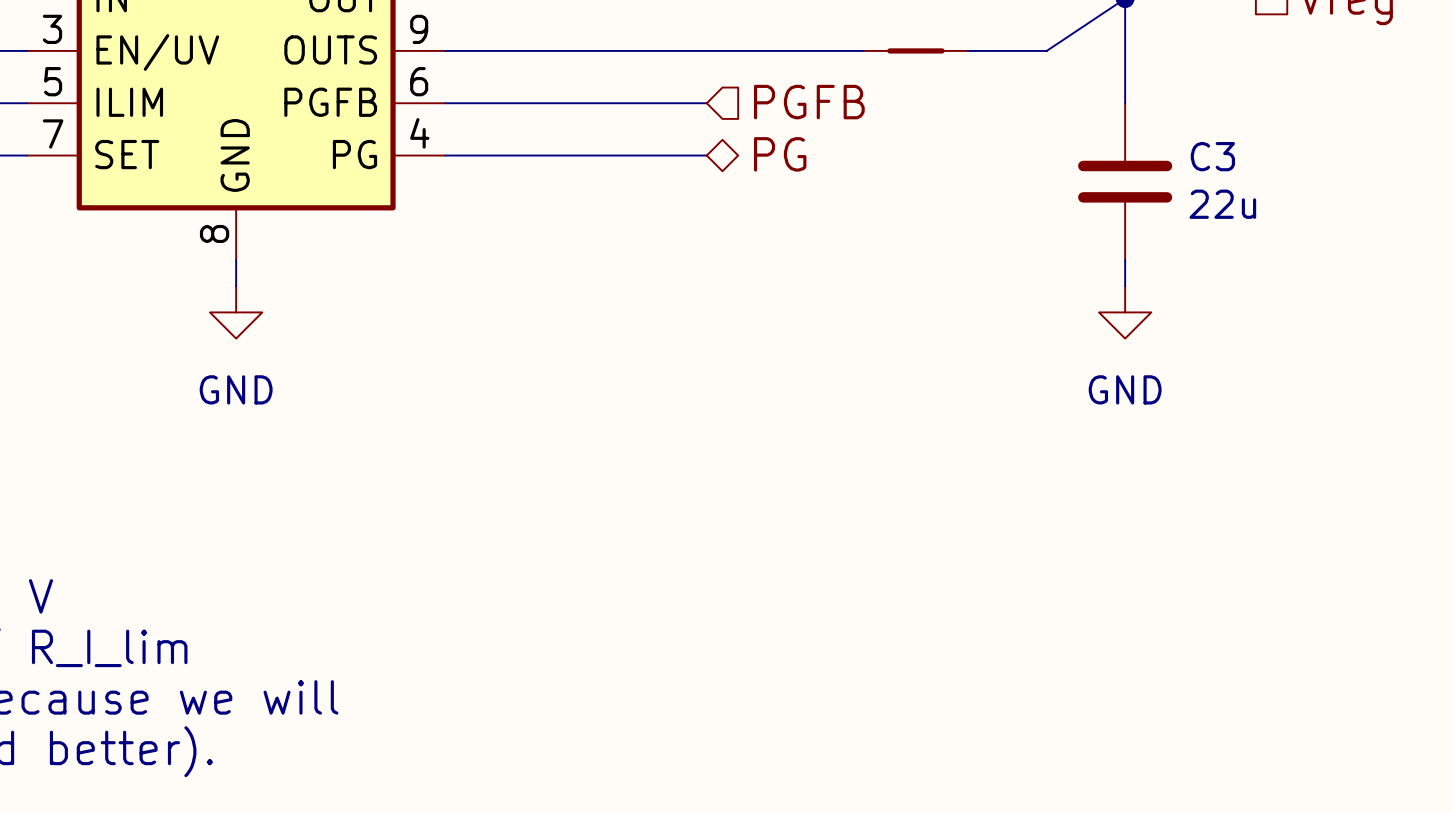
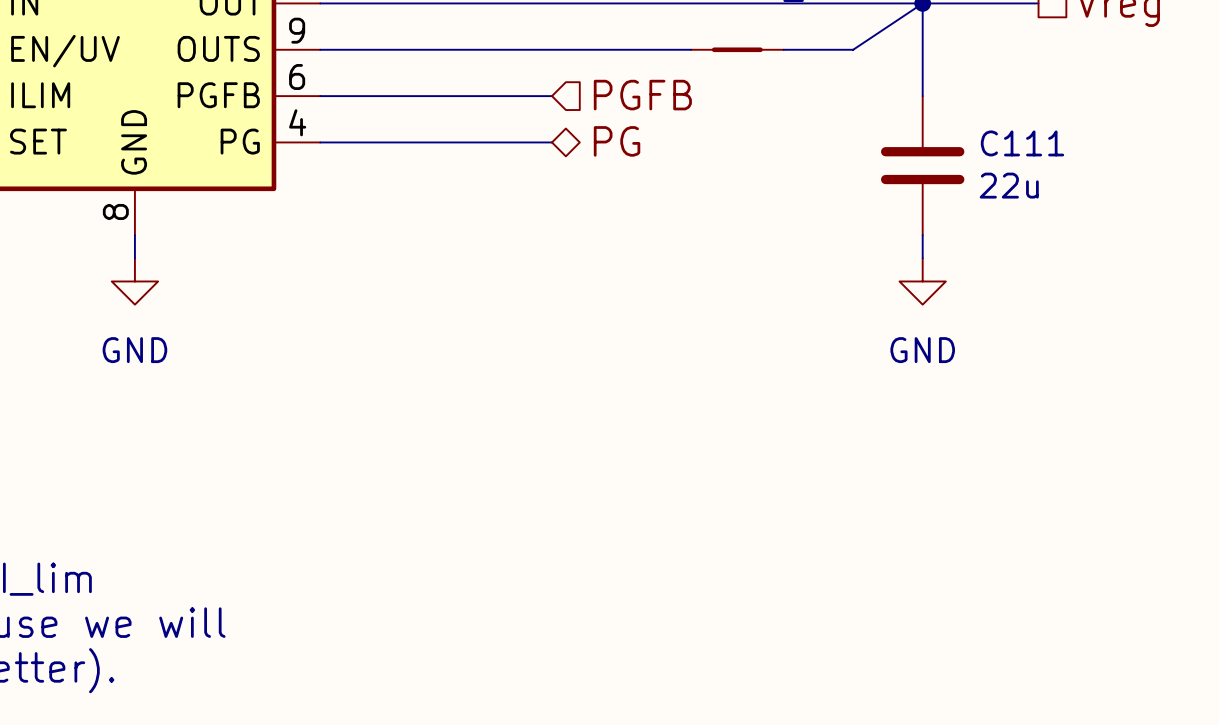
C3 name: C3 (1212, 156) -> C111 (1022, 143)

